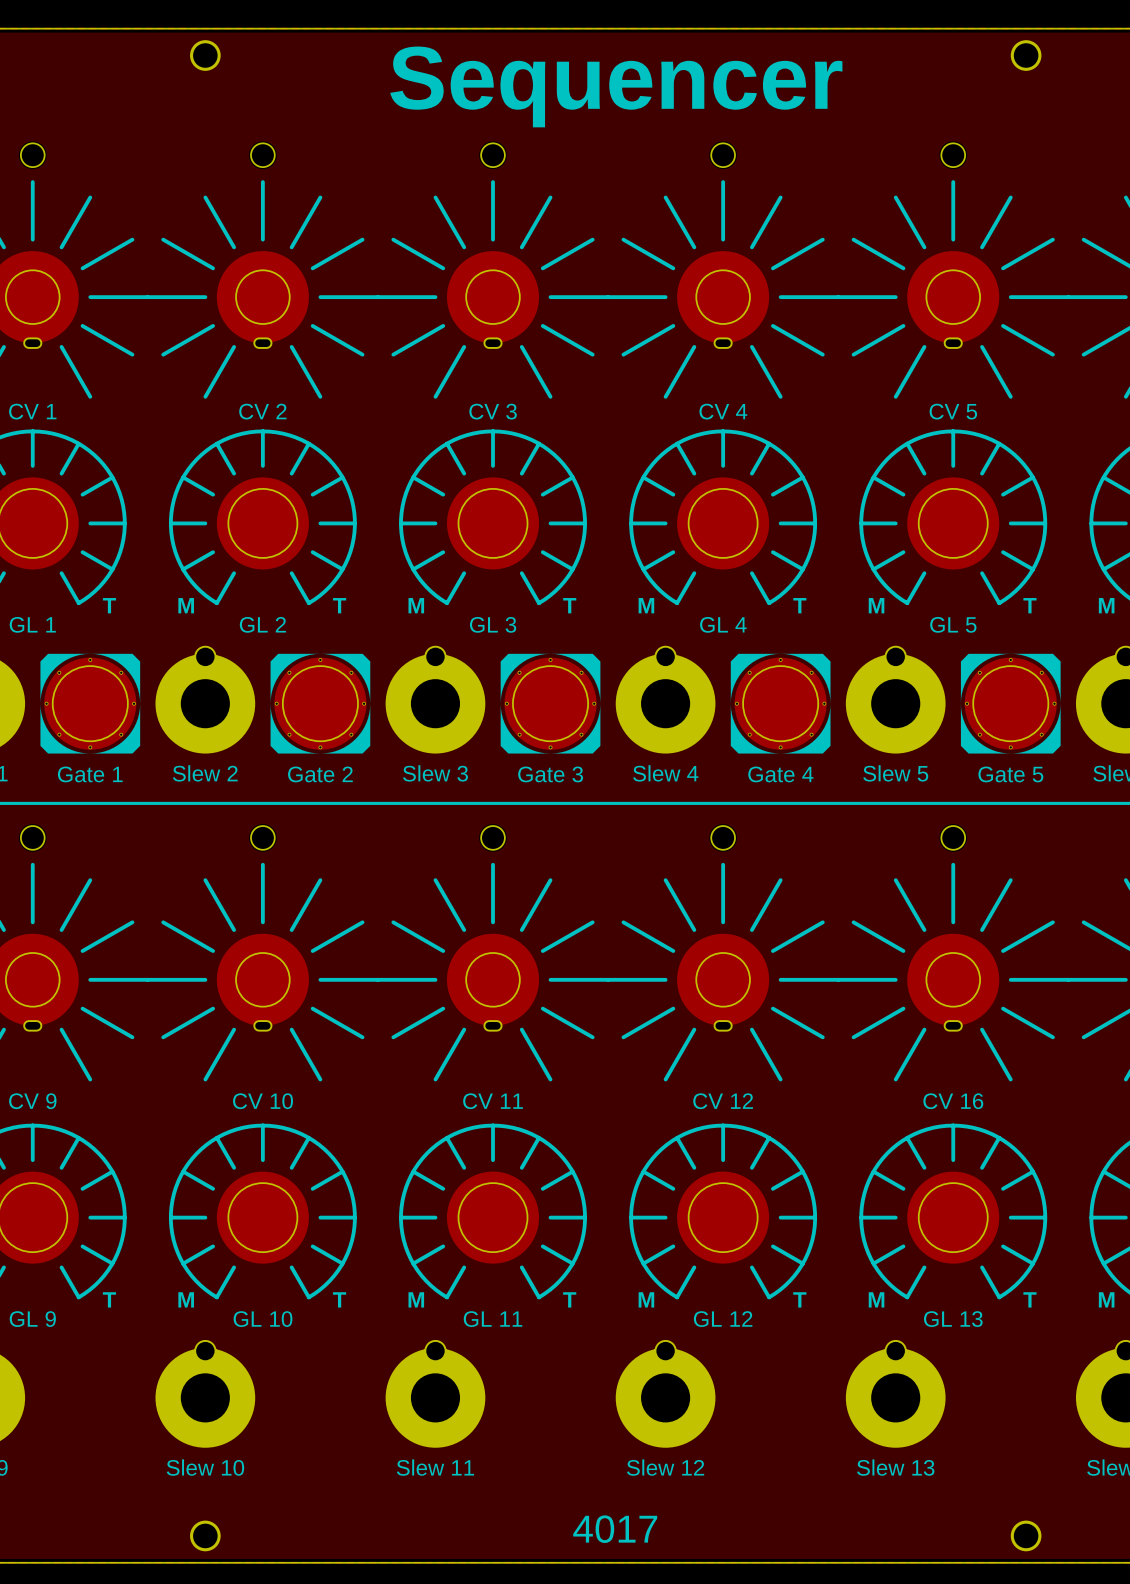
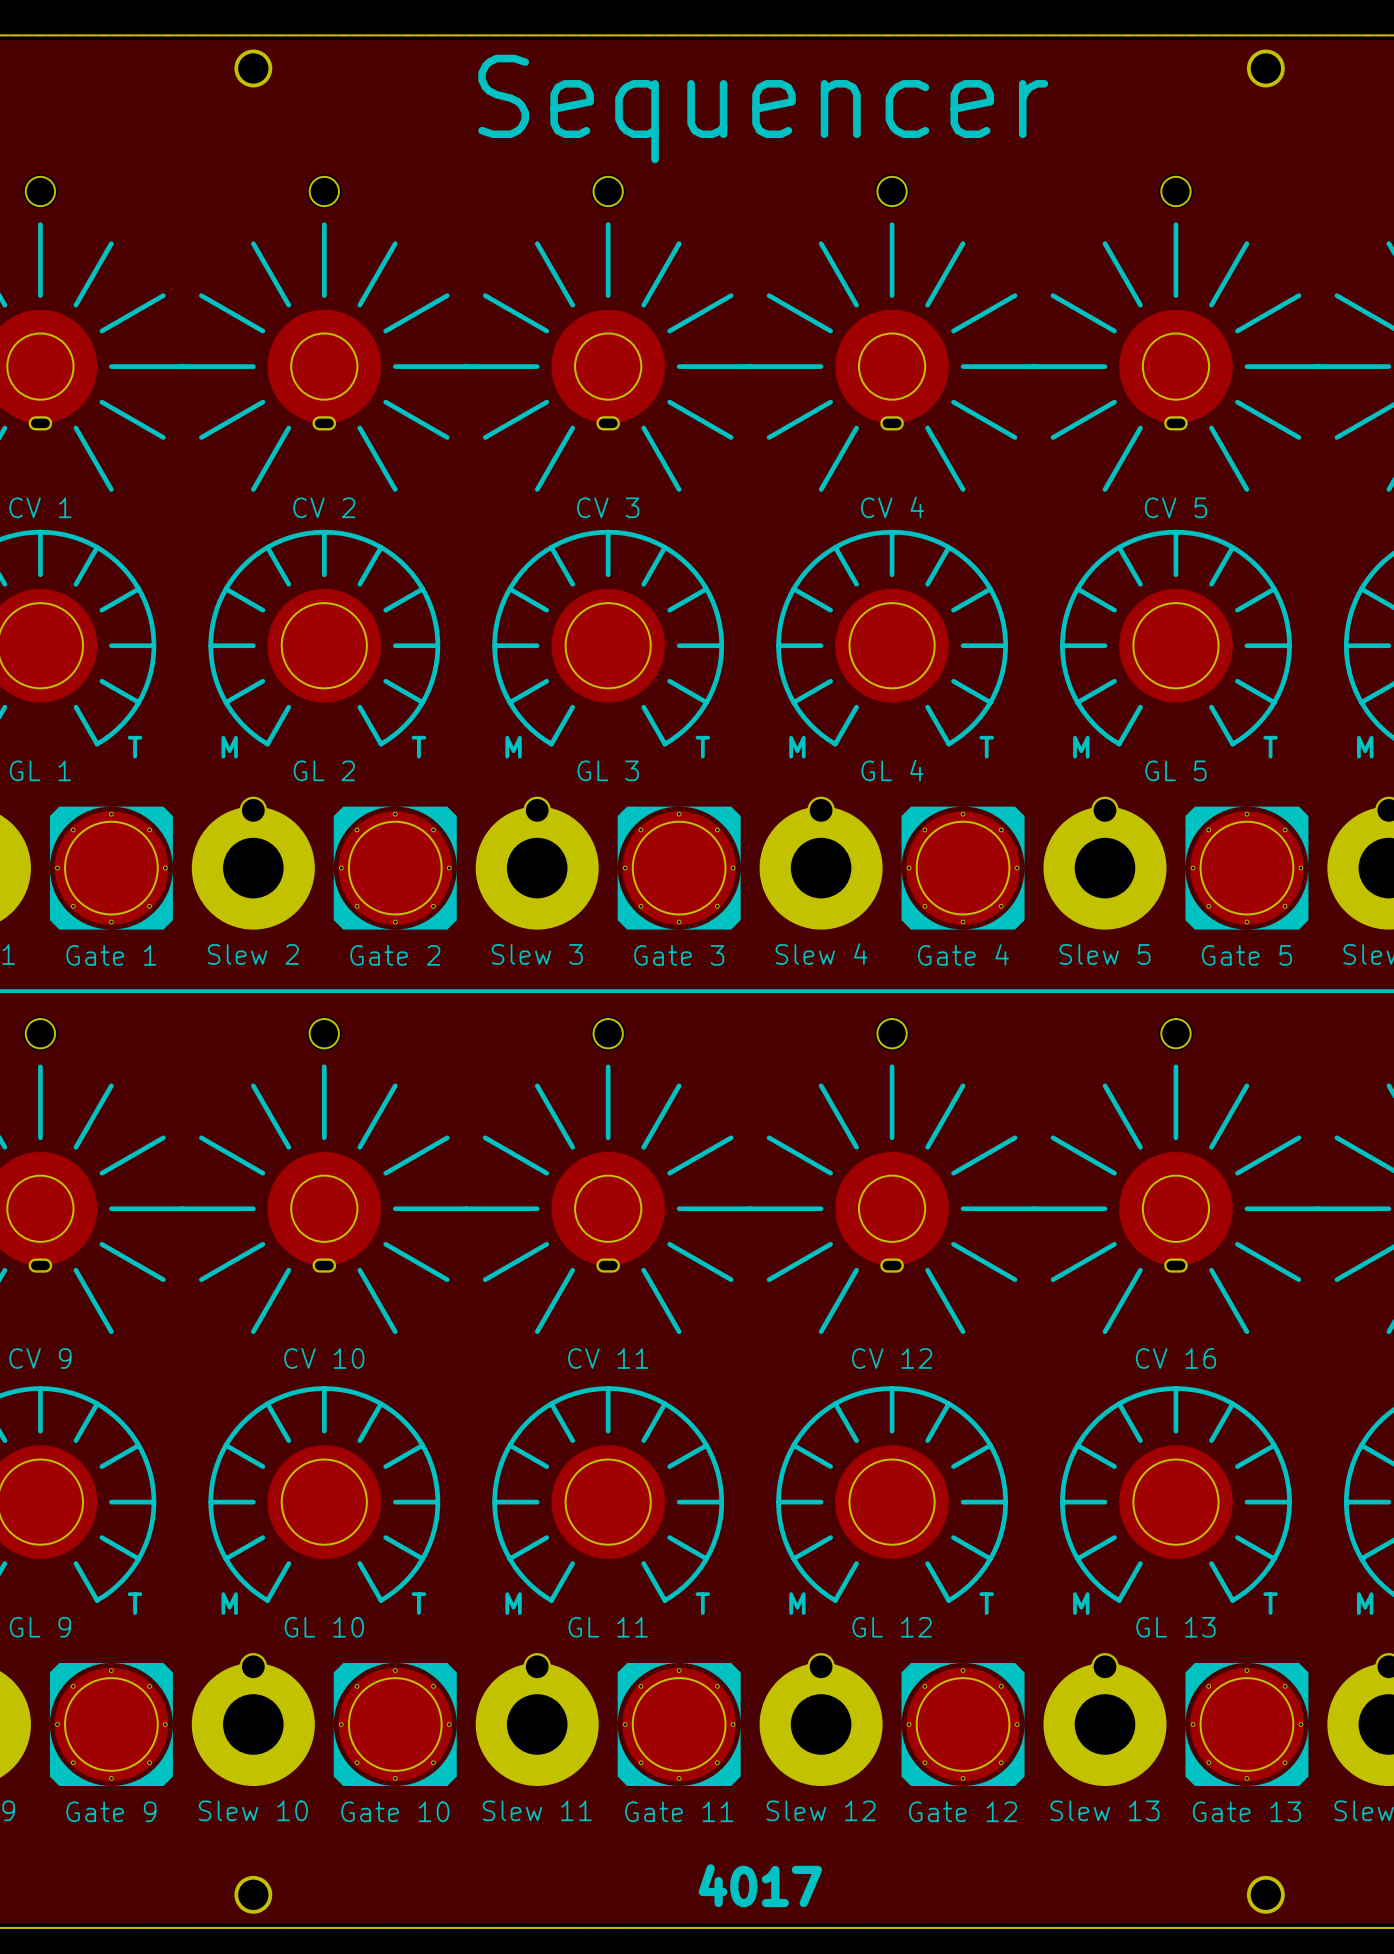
part: none -> Gate 9 (111, 1724)
part: none -> Gate 10 (395, 1724)
part: none -> Gate 11 (679, 1724)
part: none -> Gate 12 (963, 1724)
part: none -> Gate 13 (1246, 1724)

